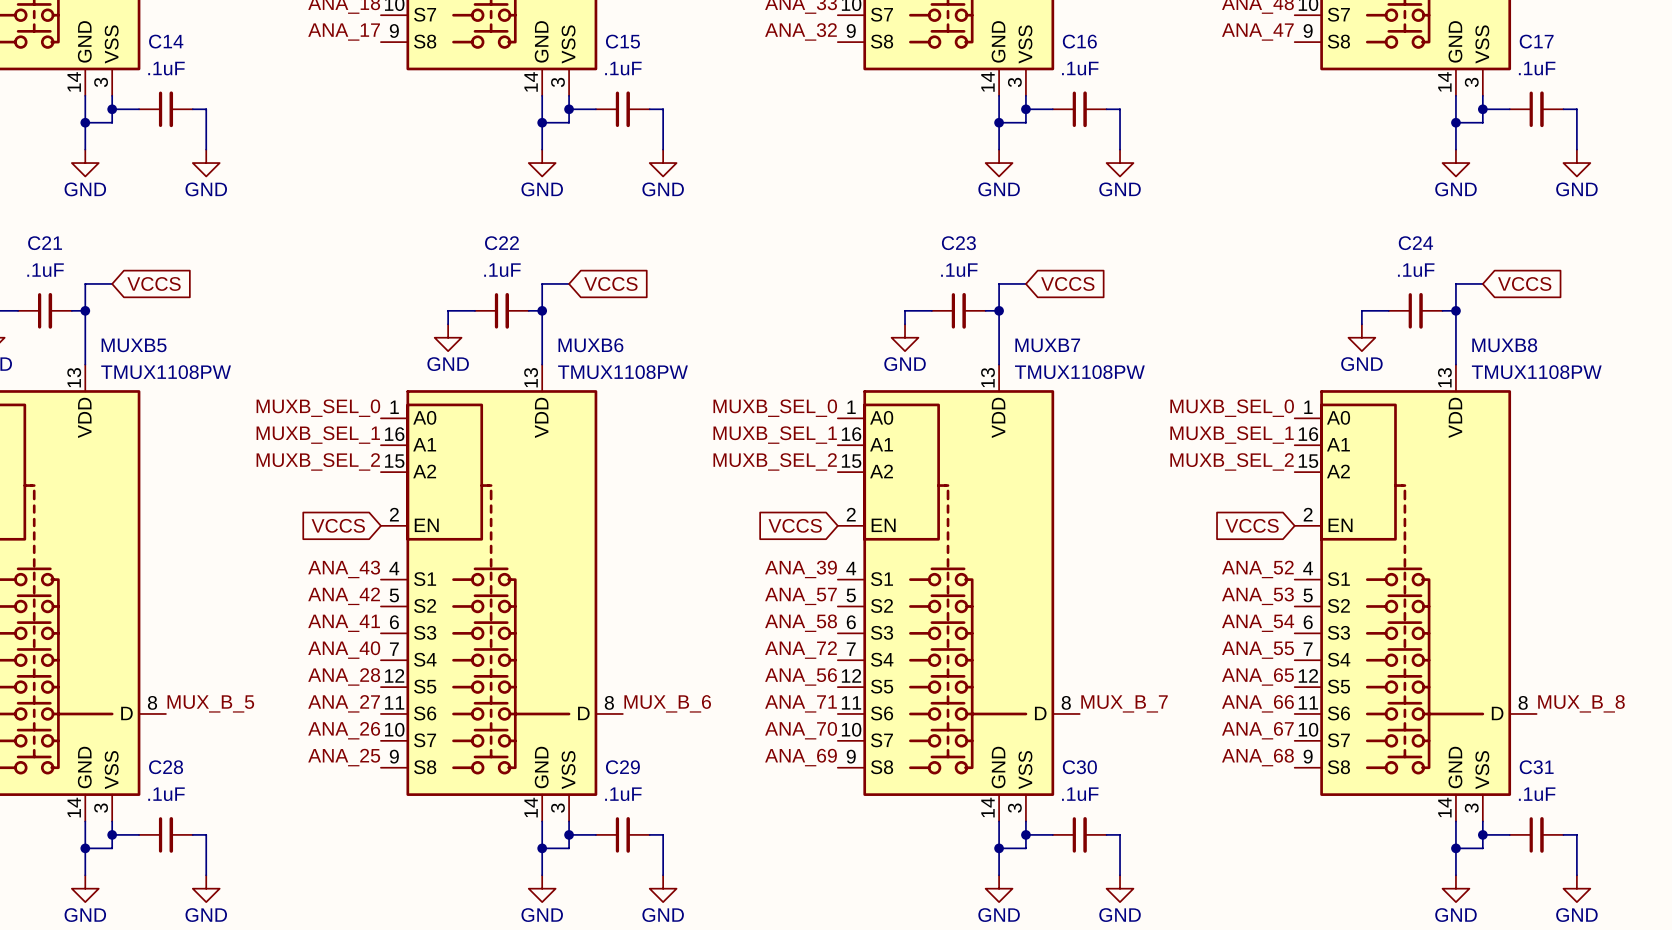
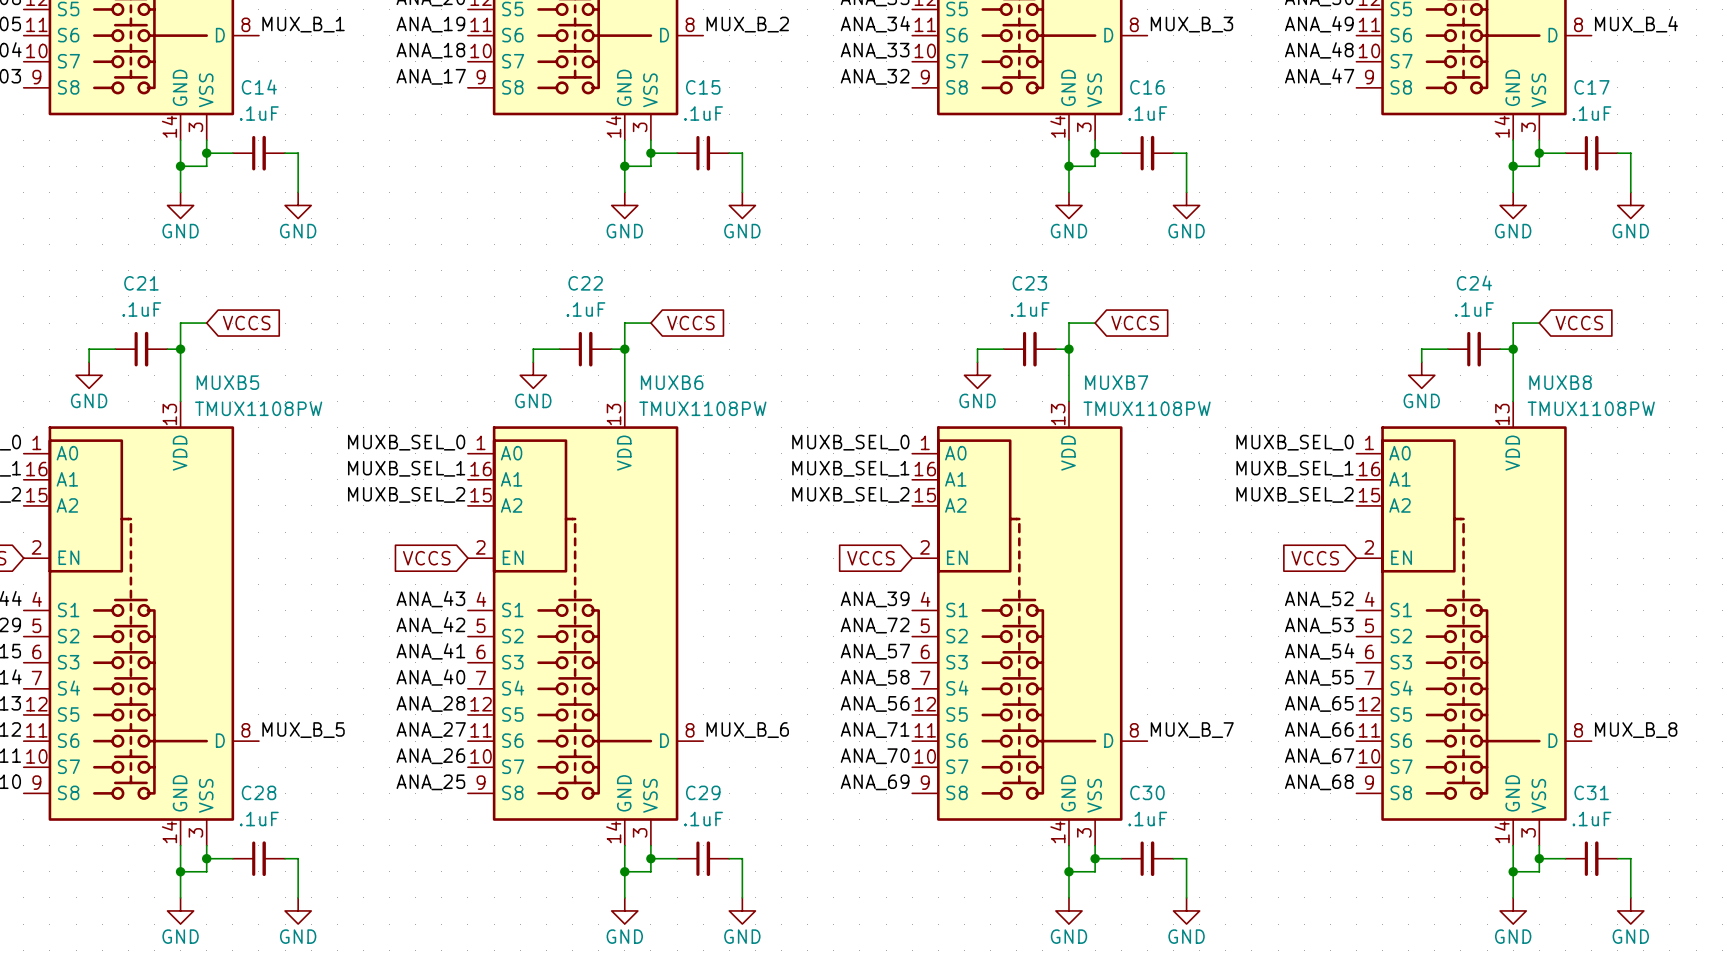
label: ANA_57 (800, 596) -> ANA_72 (875, 625)
label: ANA_58 (801, 623) -> ANA_57 (875, 651)
label: ANA_72 (800, 650) -> ANA_58 (875, 677)

